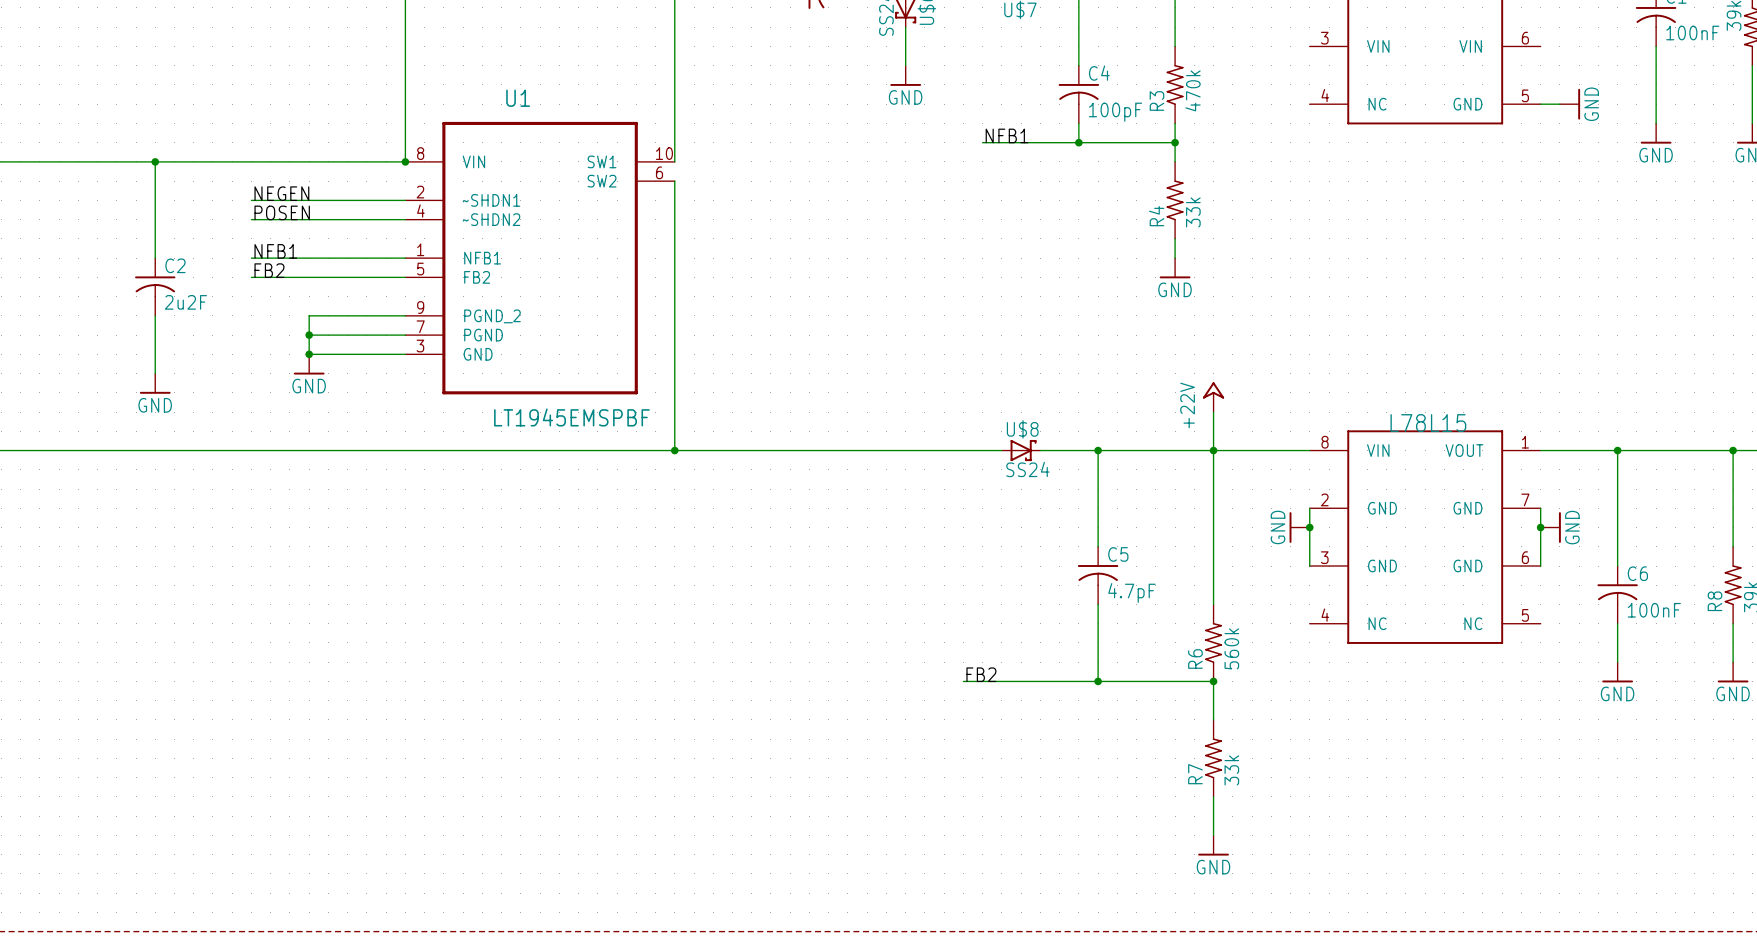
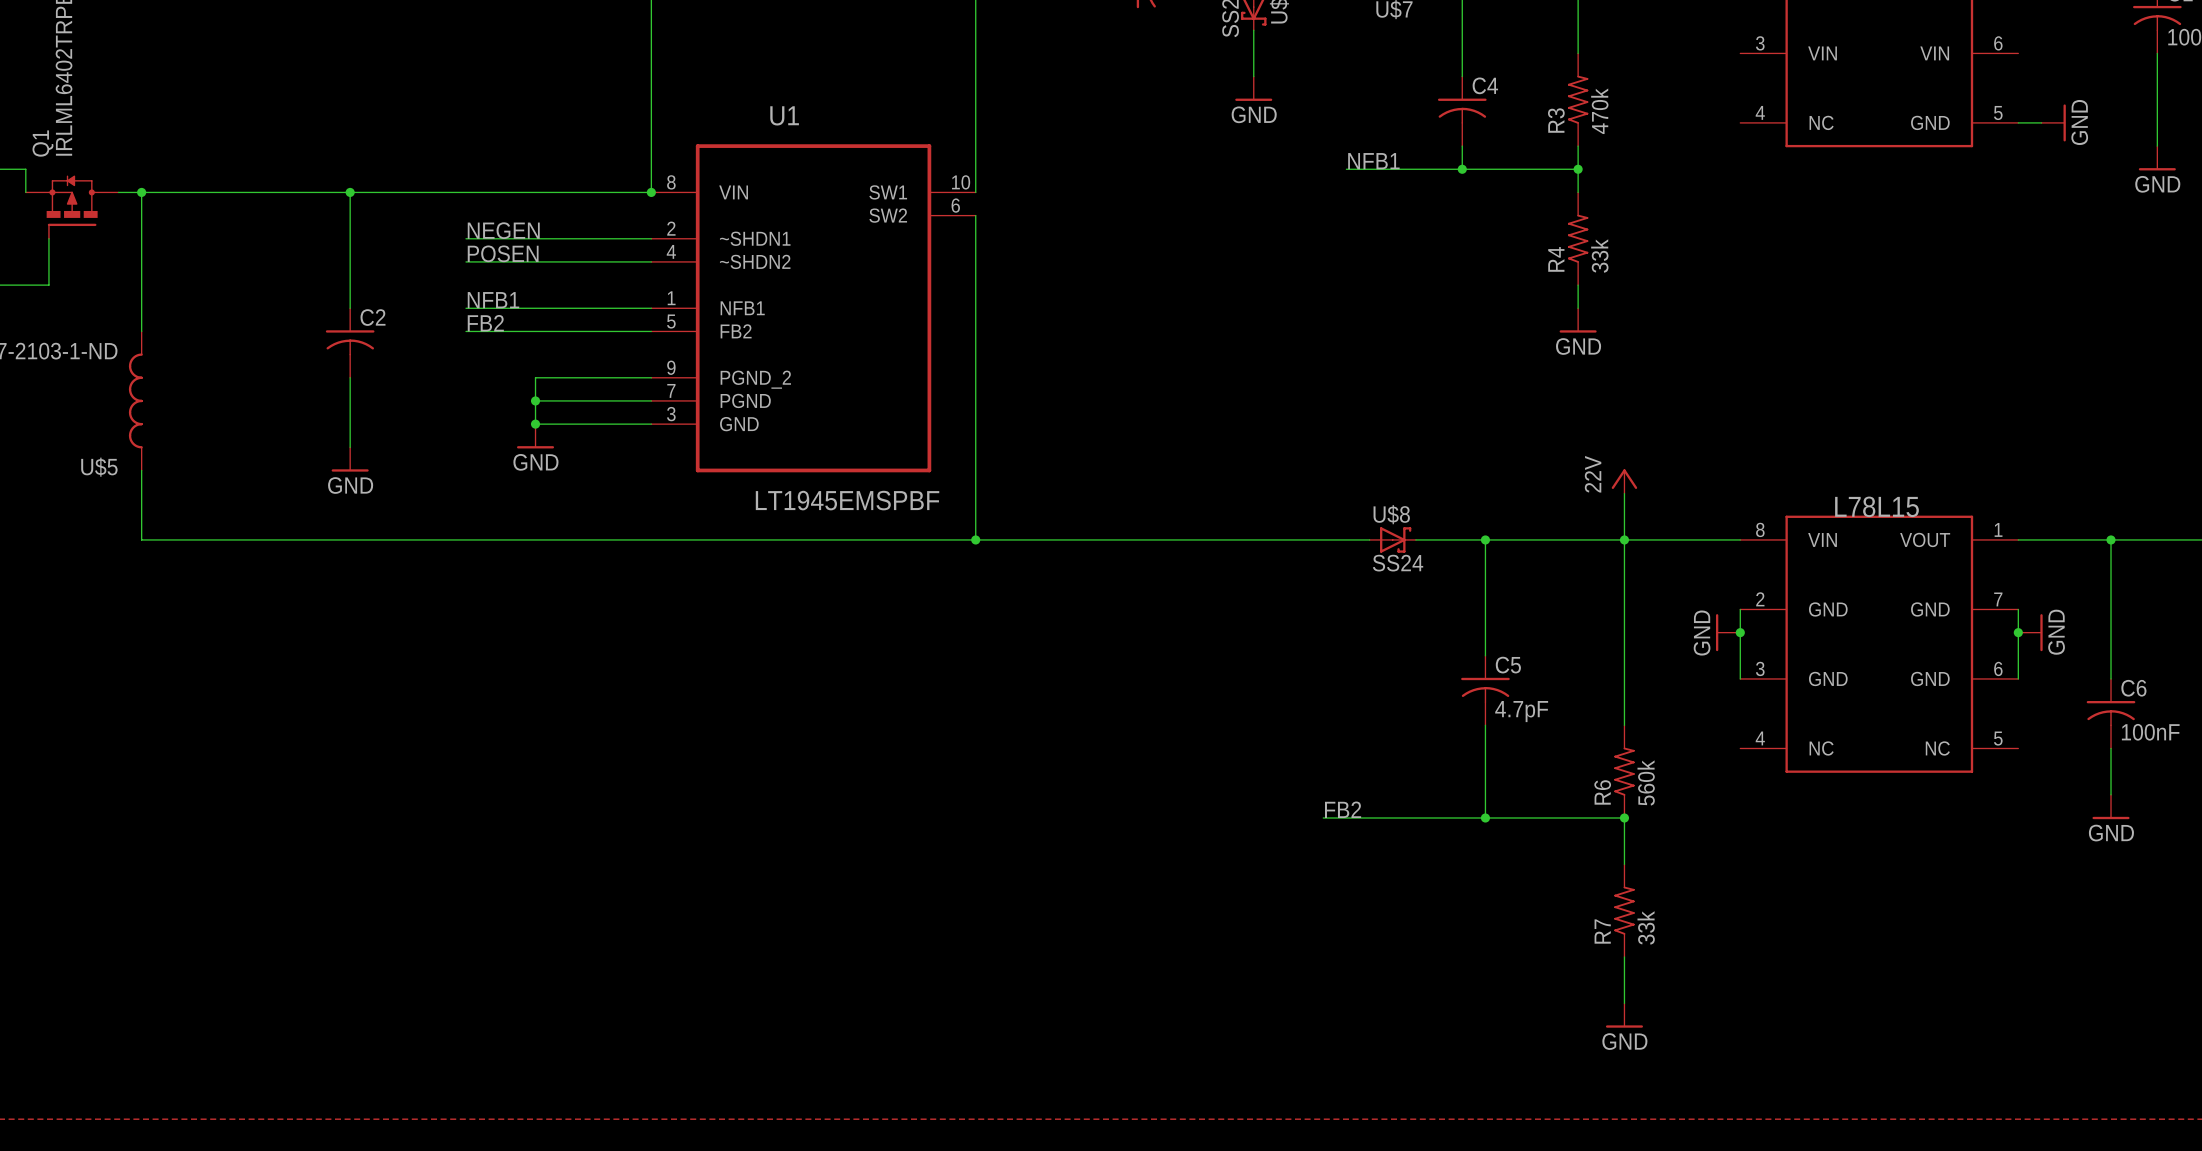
C4 value: 100pF (1115, 112) -> none
C2 value: 2u2F (185, 302) -> none
power symbol: +22V (1213, 397) -> 22V (1624, 481)

